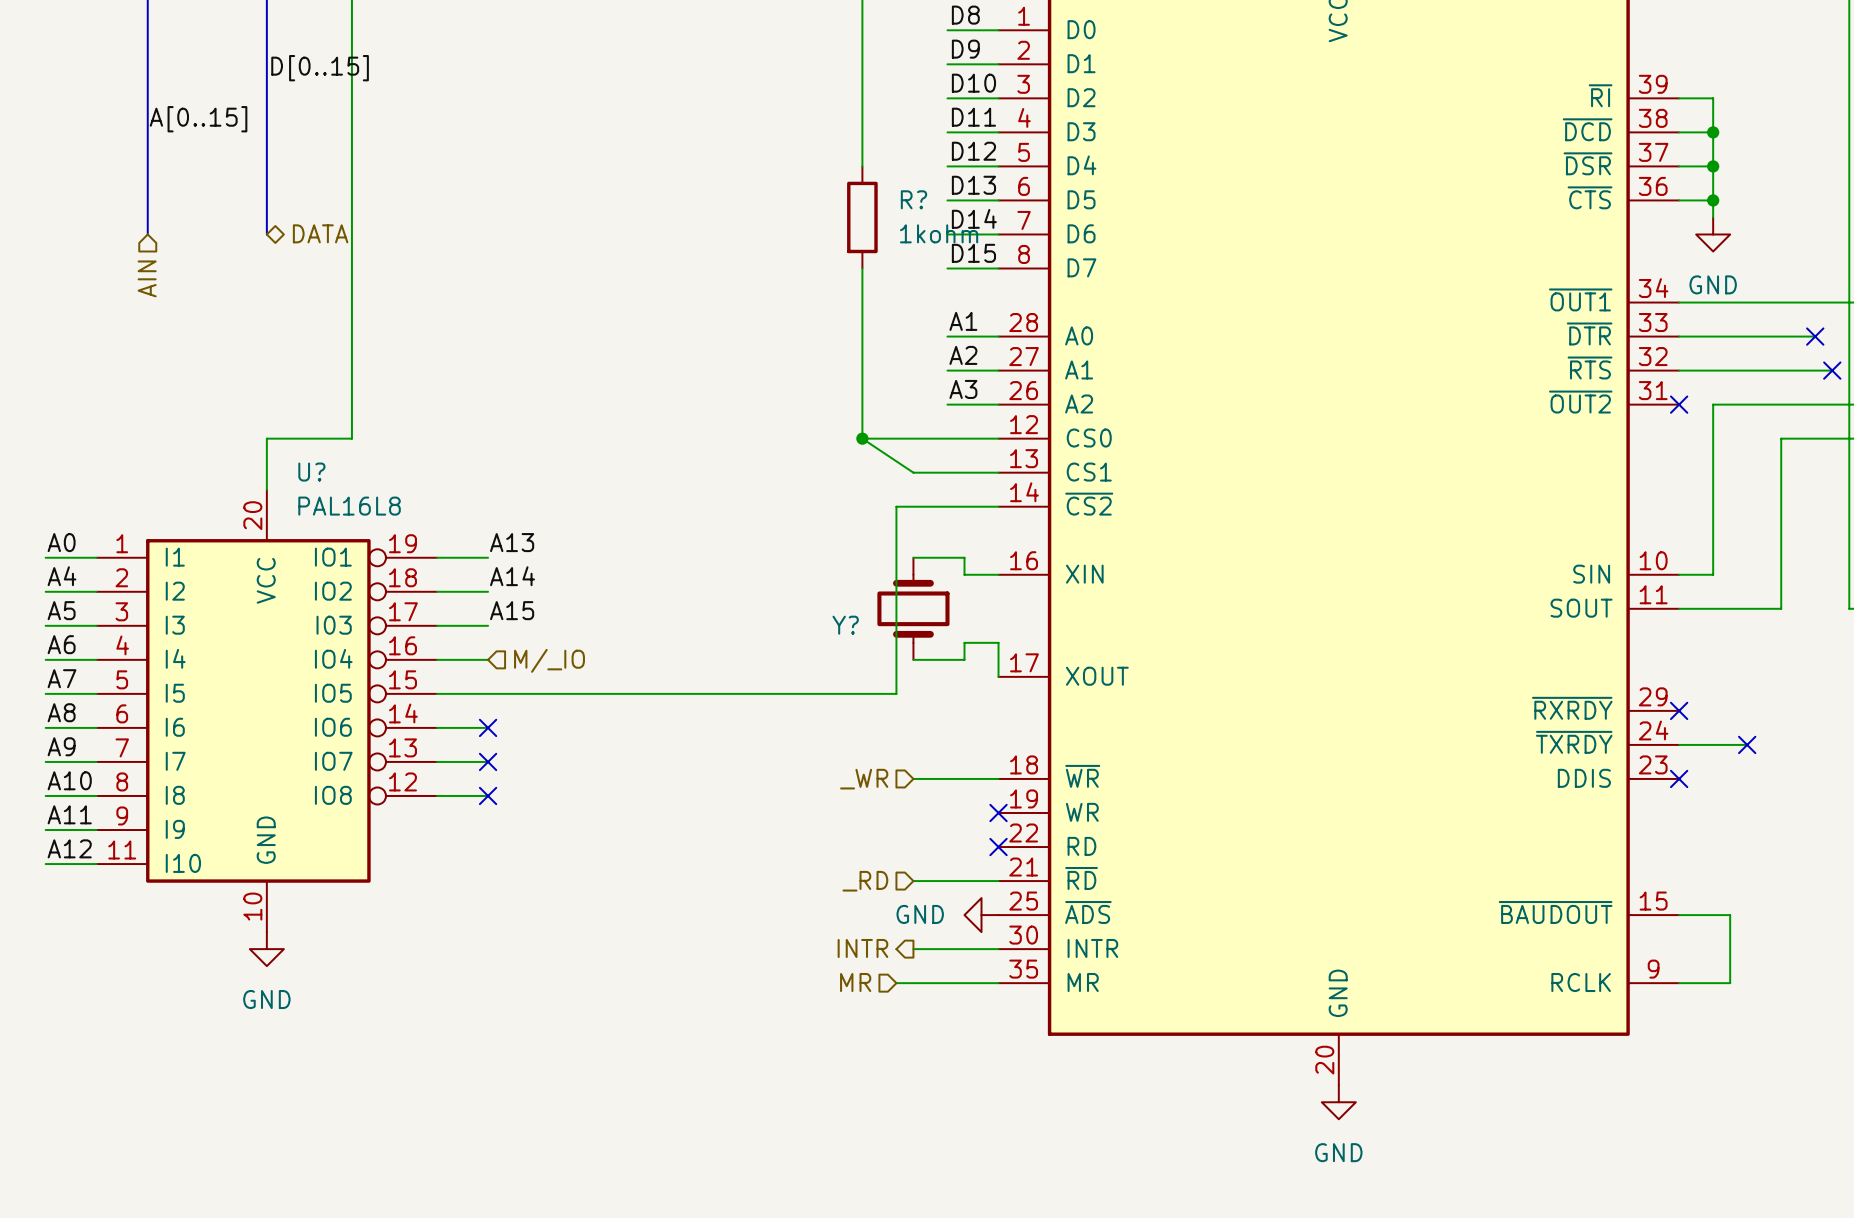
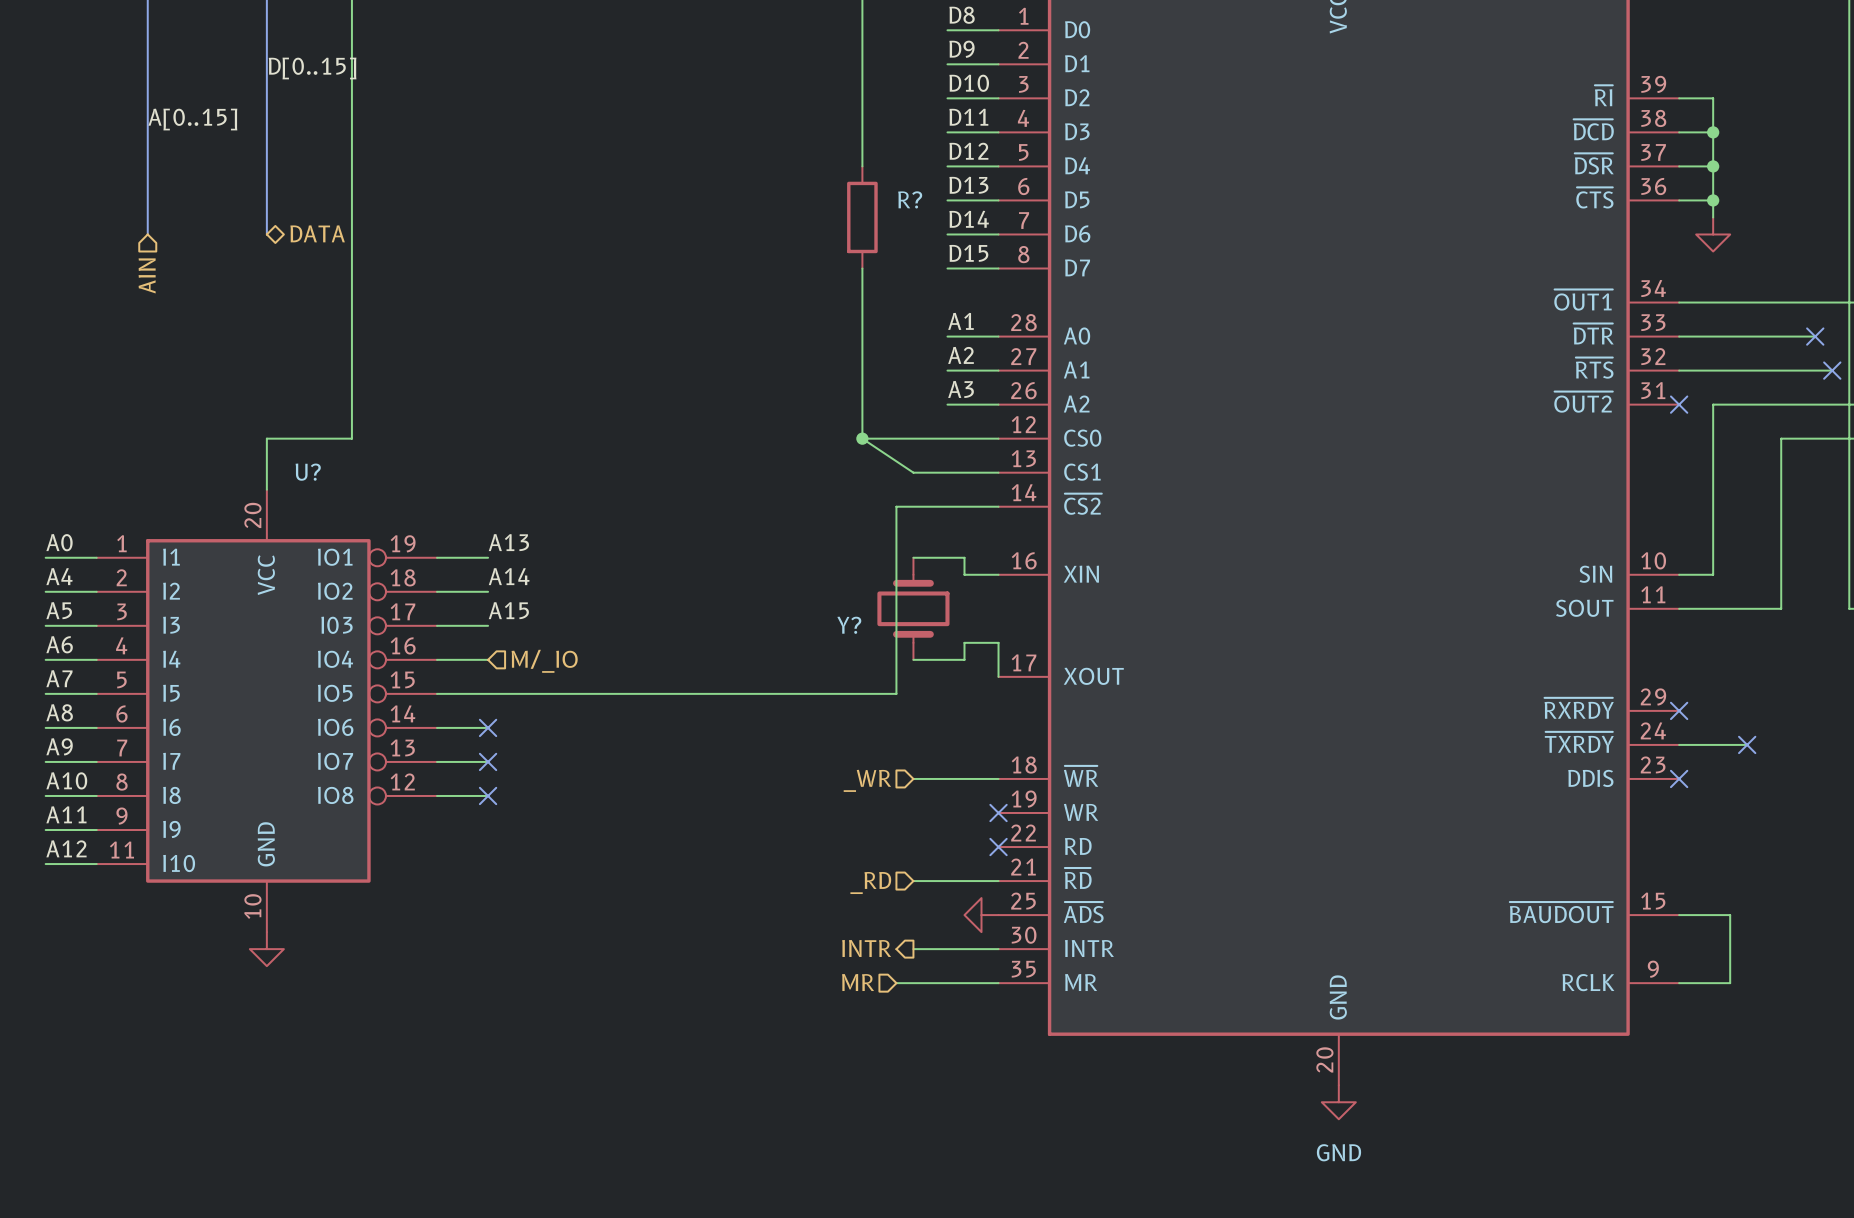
R? value: 1kohm (939, 233) -> none
power symbol text: GND (1713, 284) -> none
U? value: PAL16L8 (349, 506) -> none
power symbol text: GND (920, 914) -> none
power symbol text: GND (266, 999) -> none

